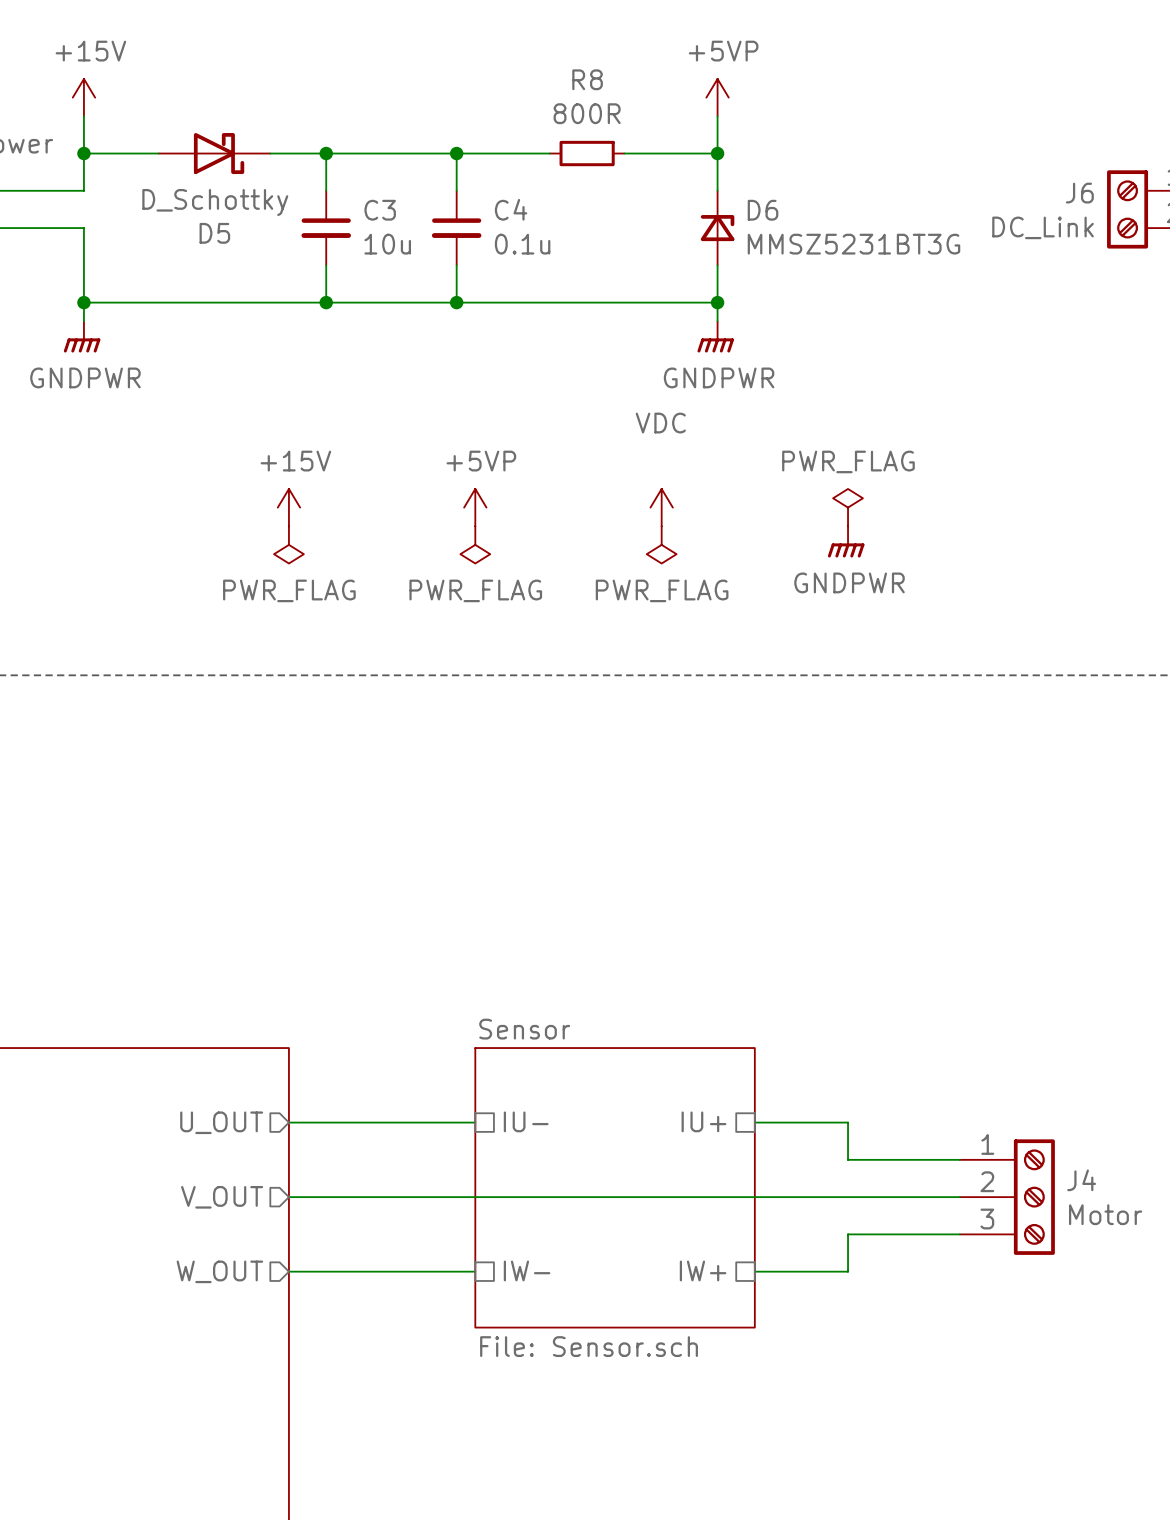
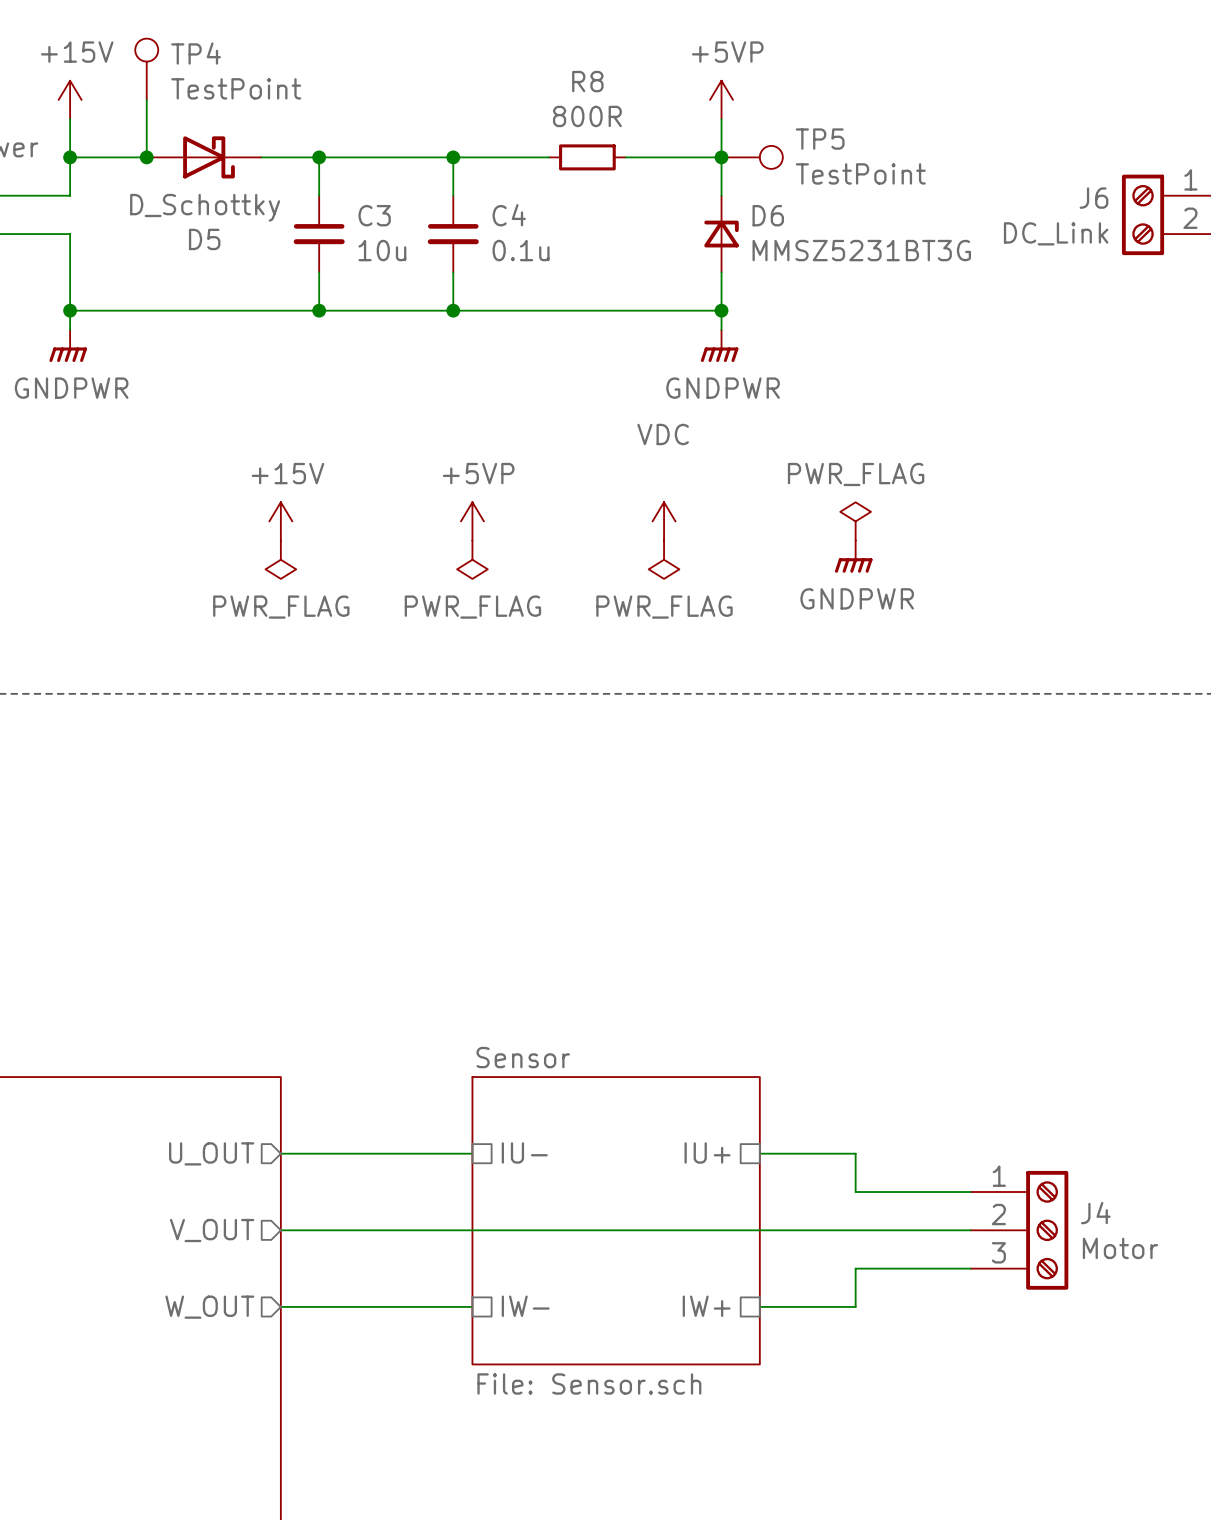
TP4: none -> TestPoint (146, 69)
wire: none -> (146, 99) (146, 157)
junction: none -> (146, 157)
TP5: none -> TestPoint (752, 157)

